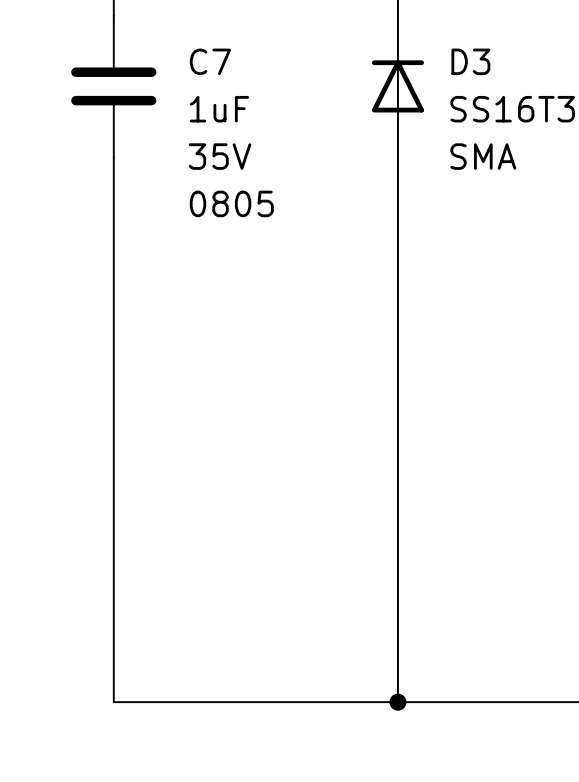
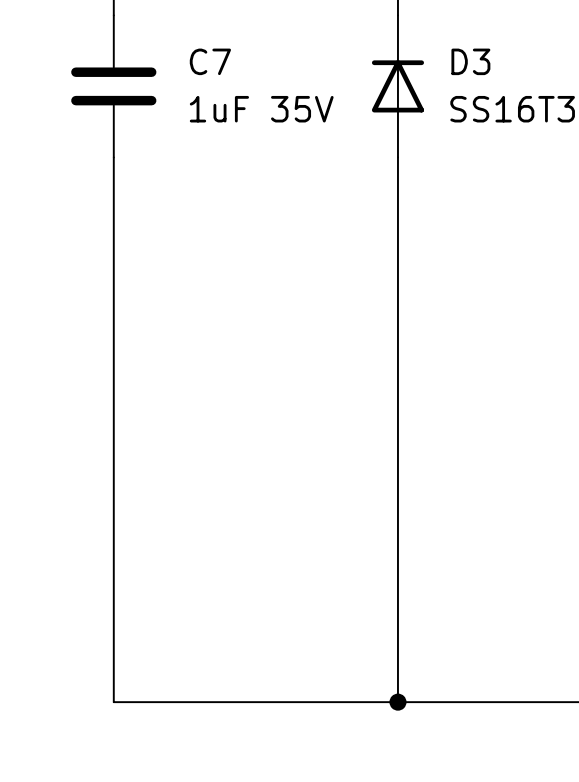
C7 value: 1uF (219, 109) -> 1uF 35V (261, 109)
C7 text: 35V (219, 156) -> none
D3 text: SMA (483, 156) -> none
C7 text: 0805 (231, 203) -> none

